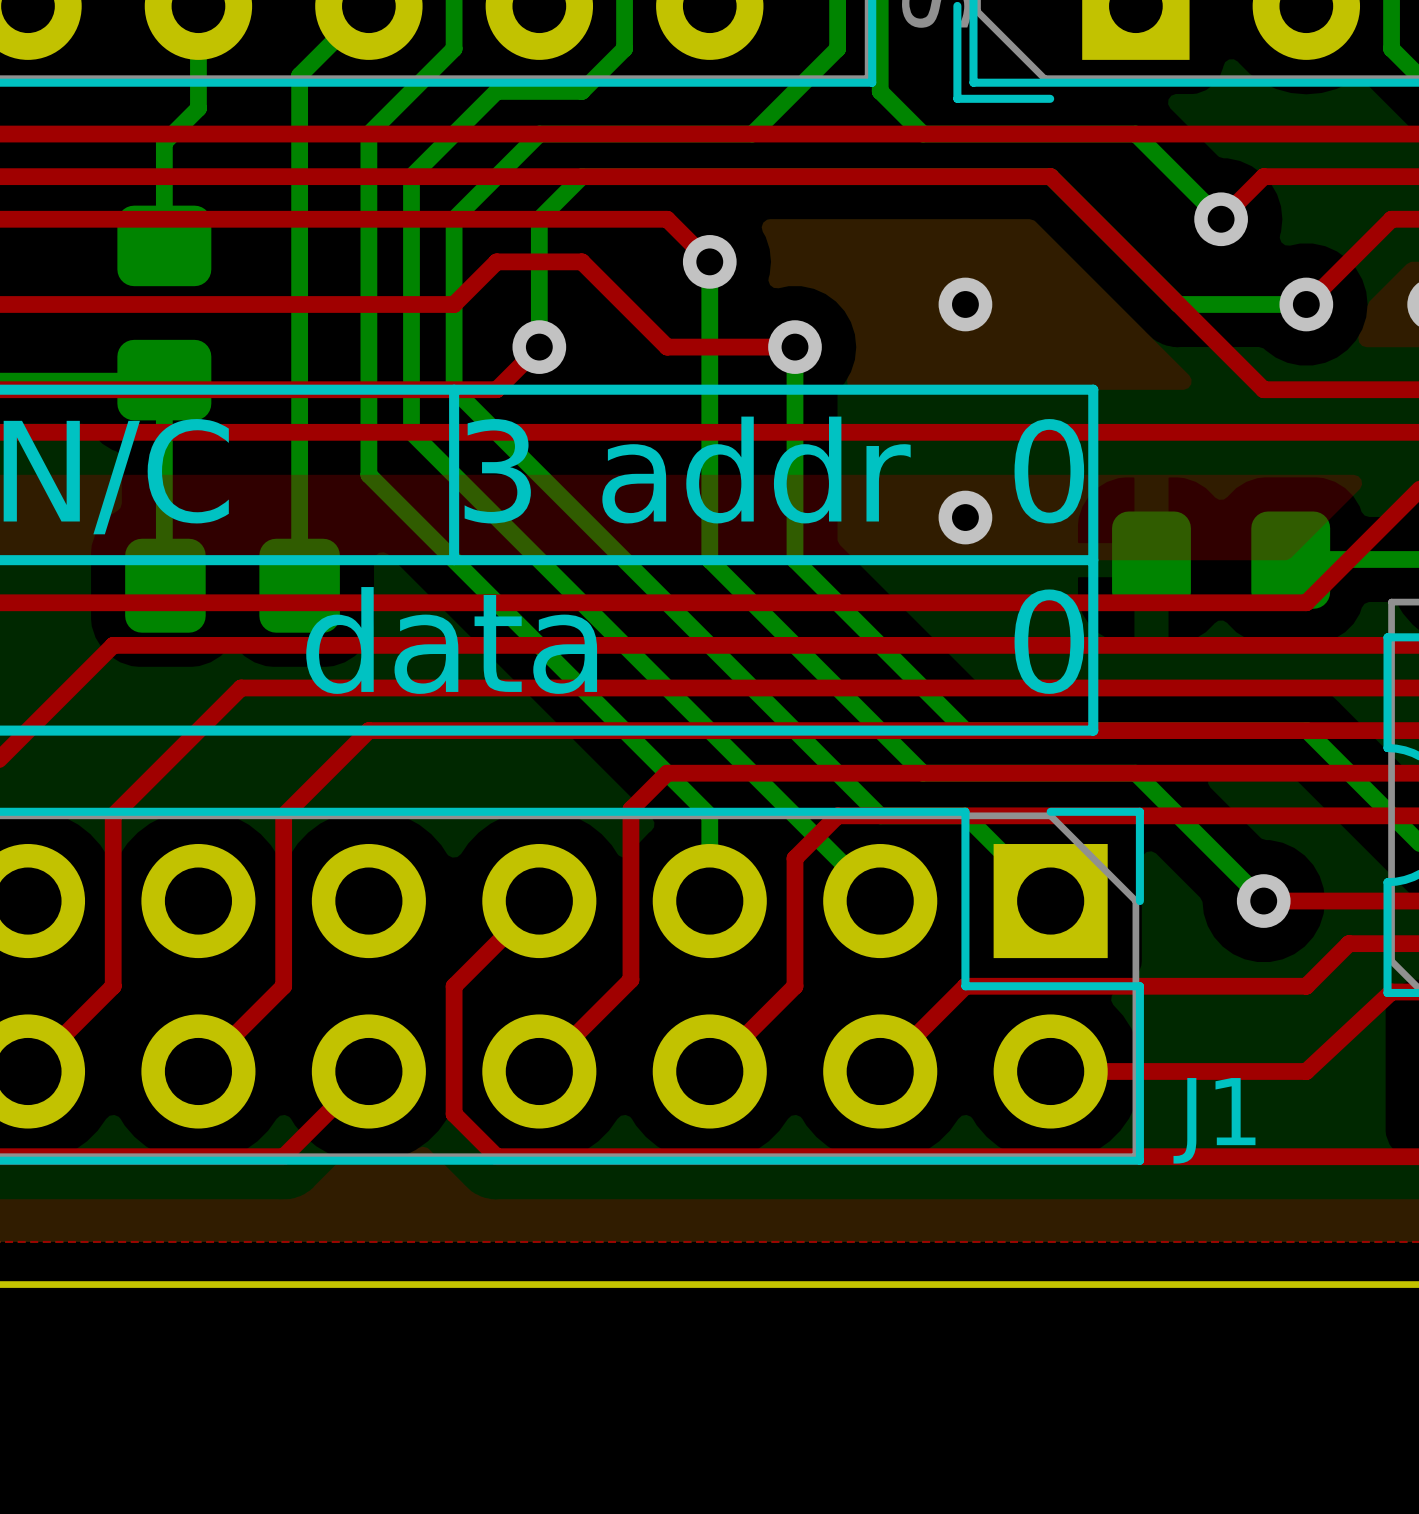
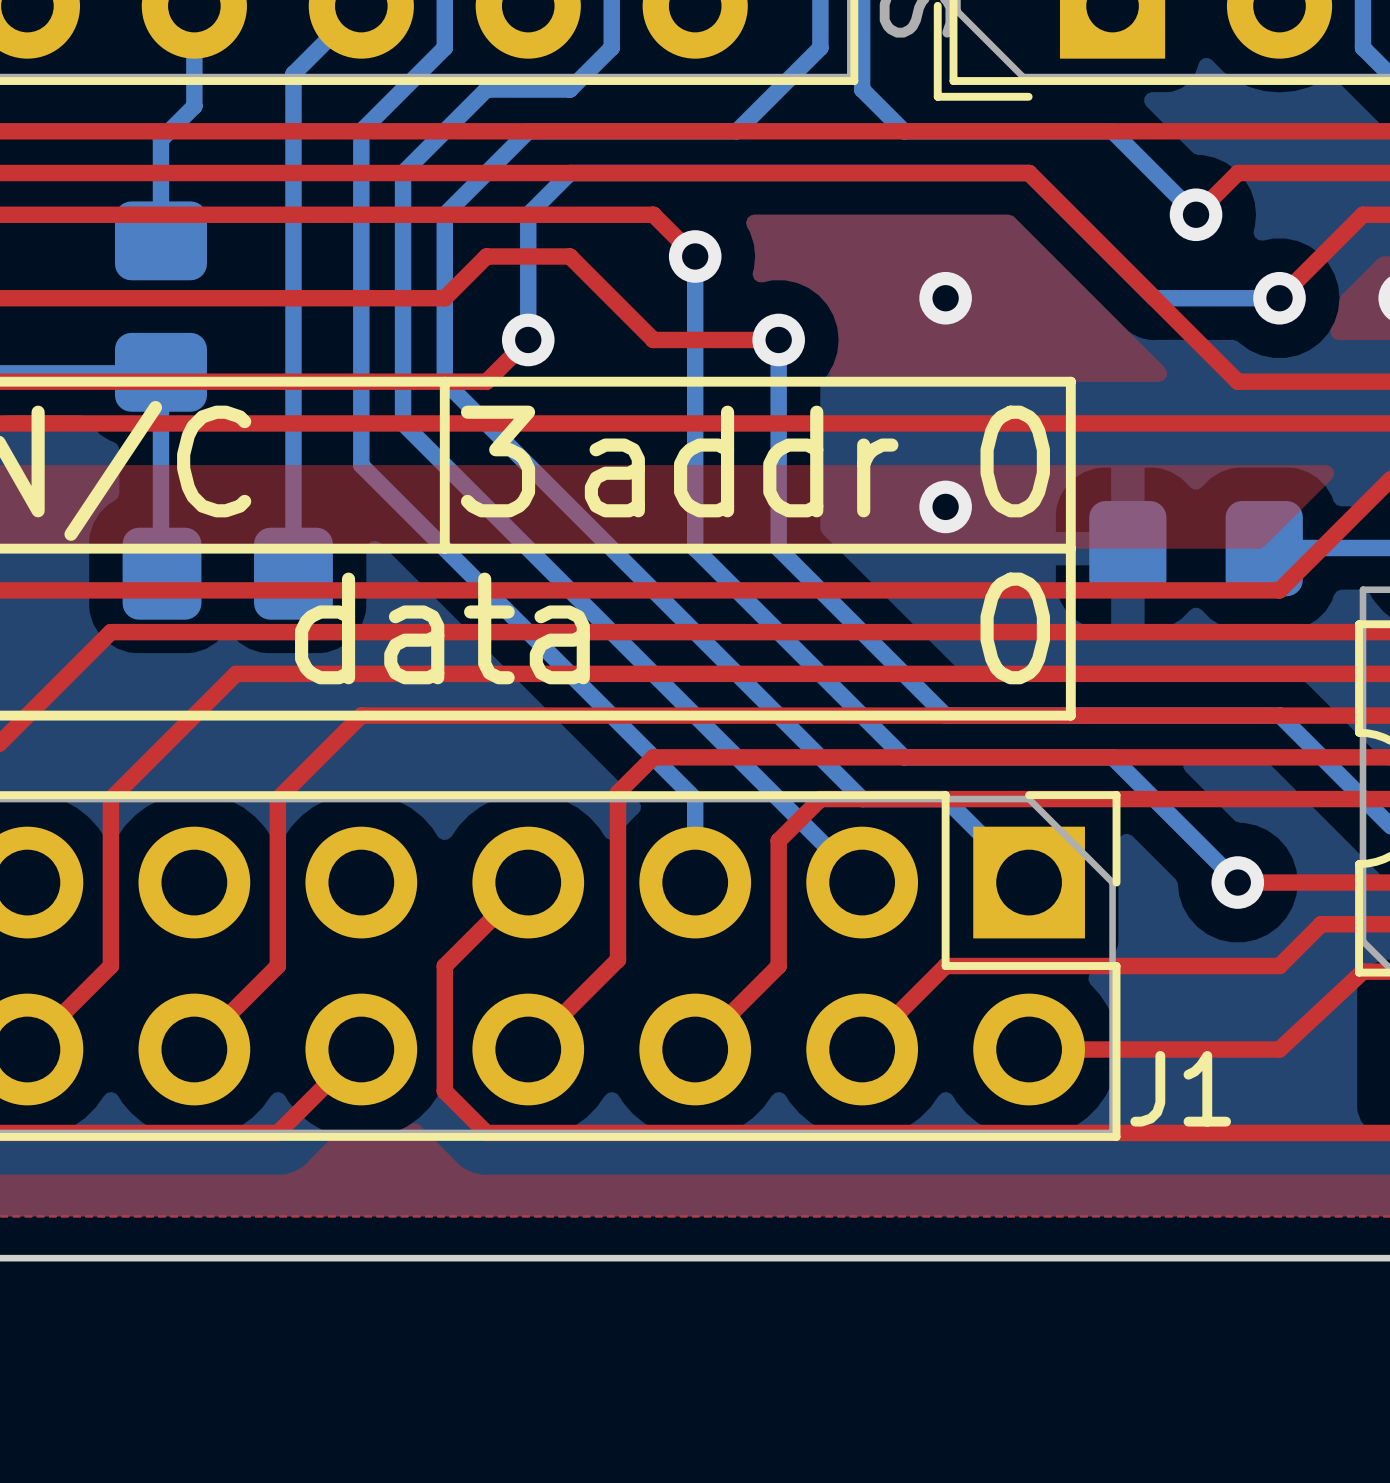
J1 name position: J1 (1214, 1120) -> J1 (1180, 1088)

